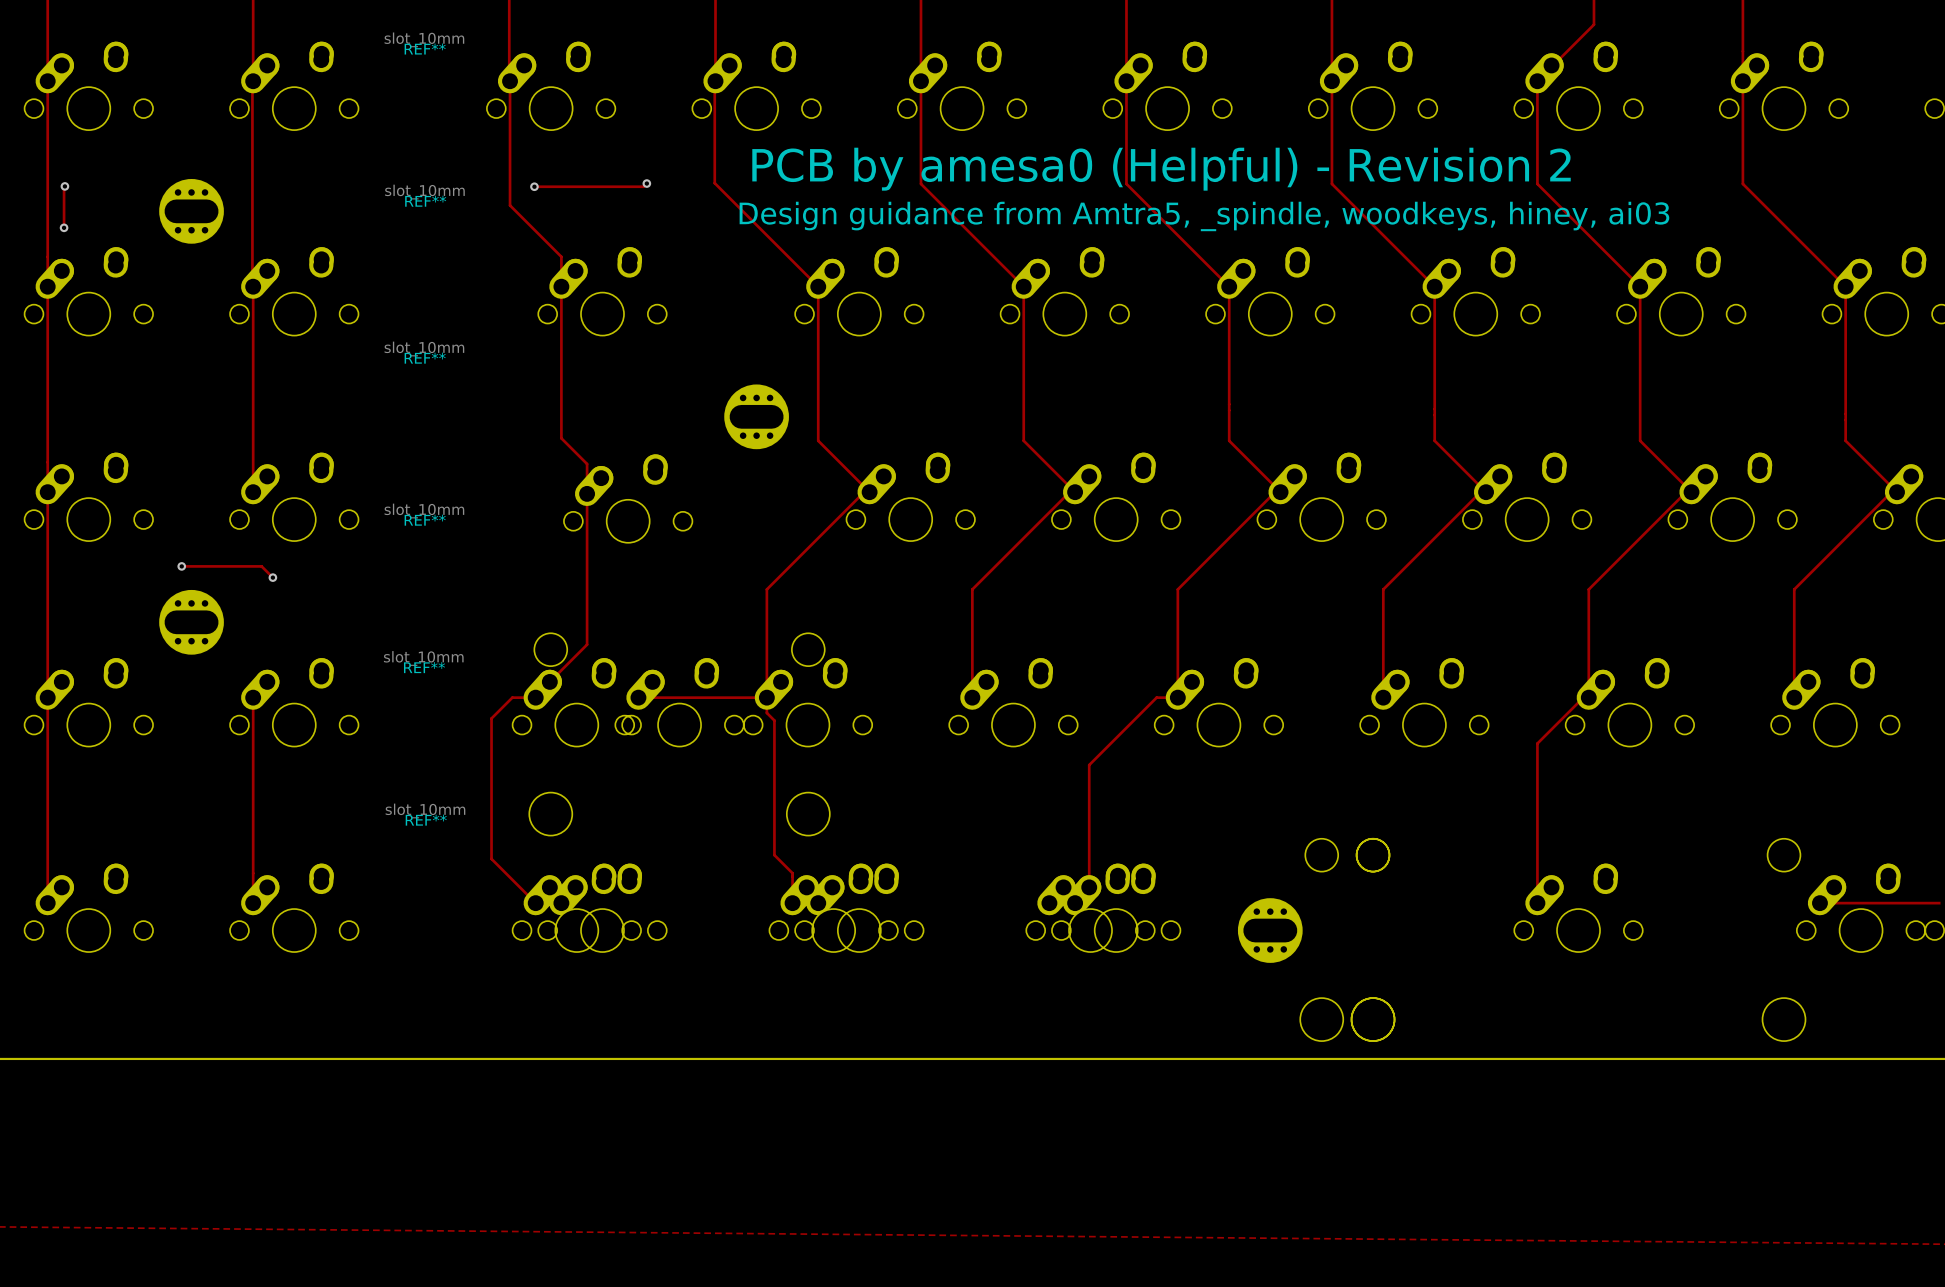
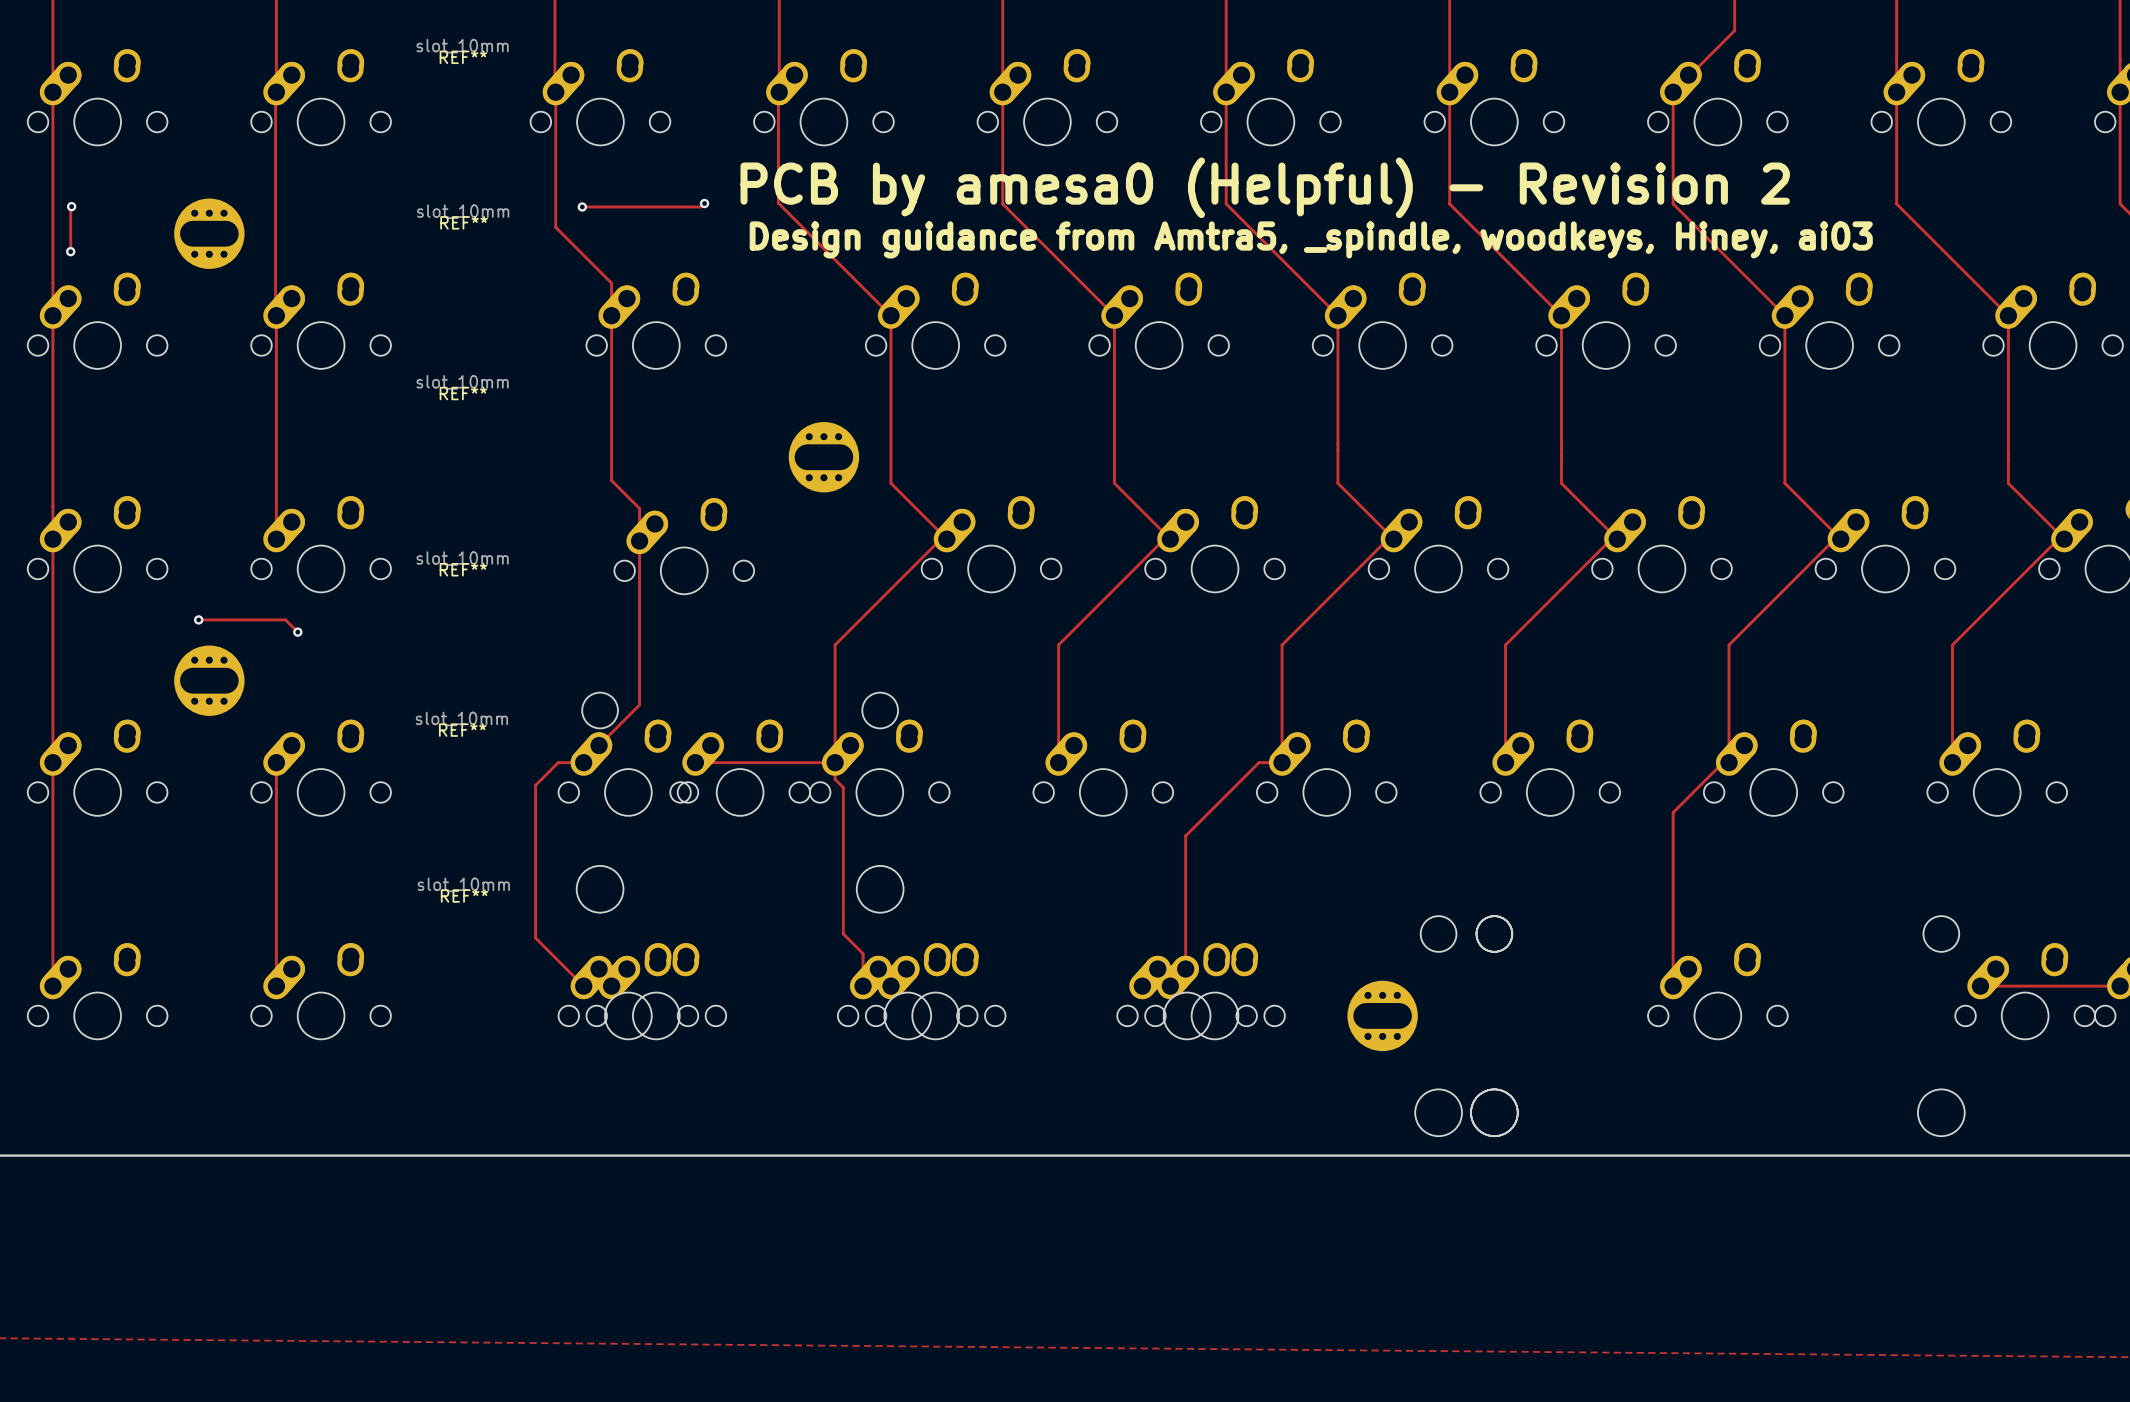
text: Design guidance from Amtra5, _spindle, woodkeys, hiney, ai03 (1204, 216) -> Design guidance from Amtra5, _spindle, woodkeys, Hiney, ai03 (1311, 239)

